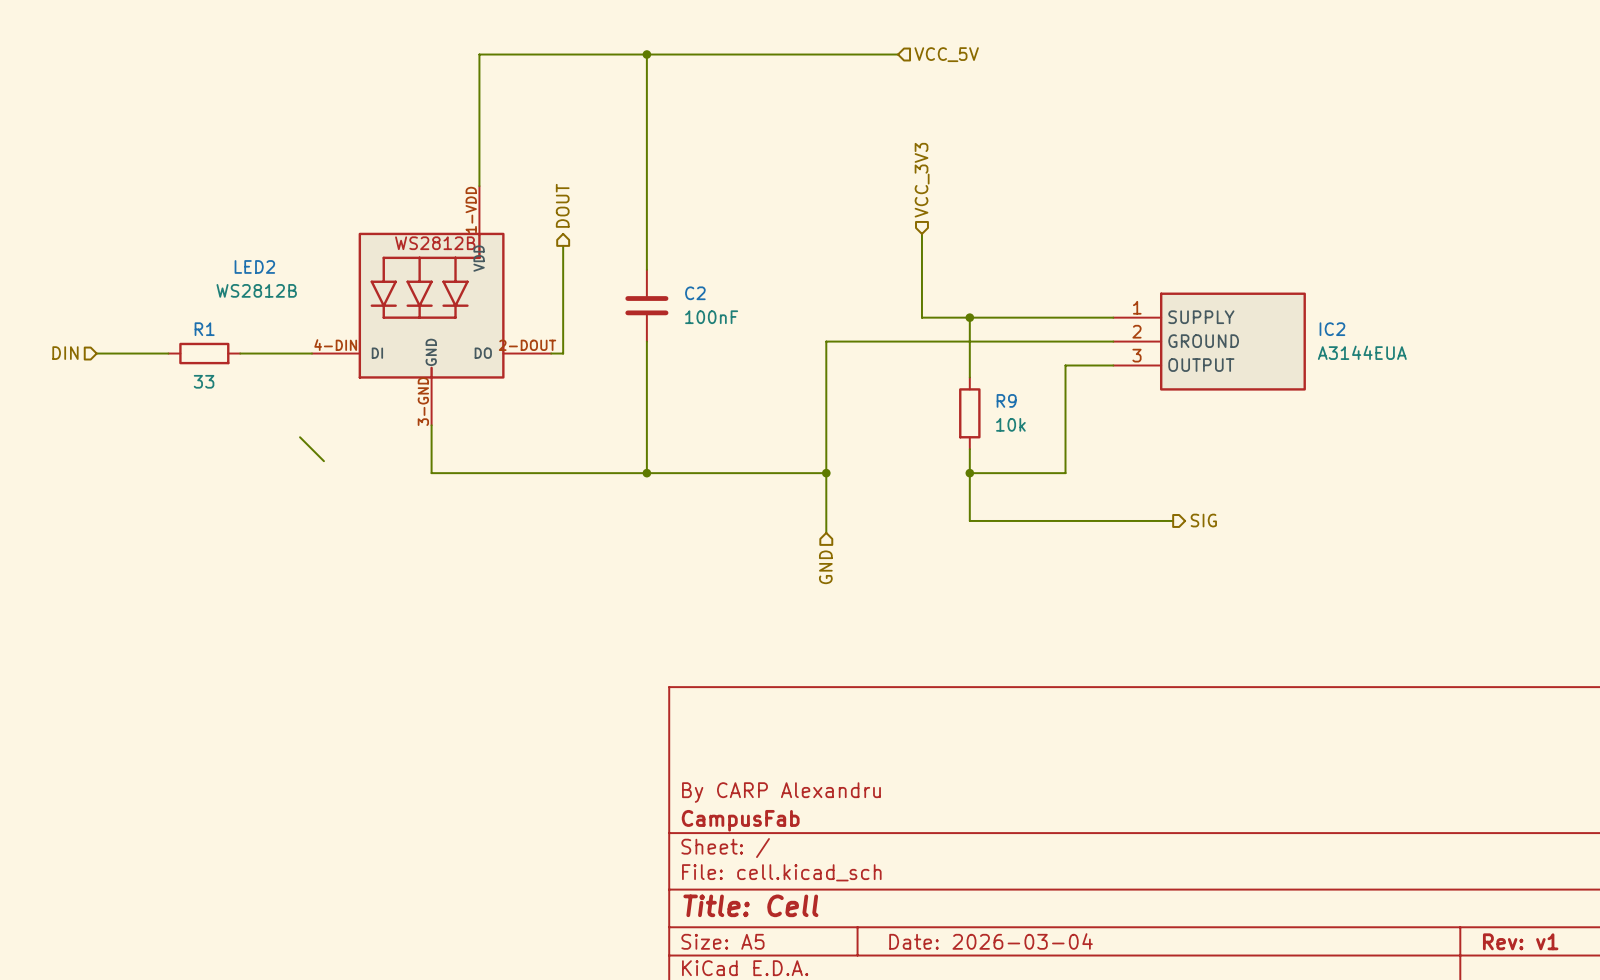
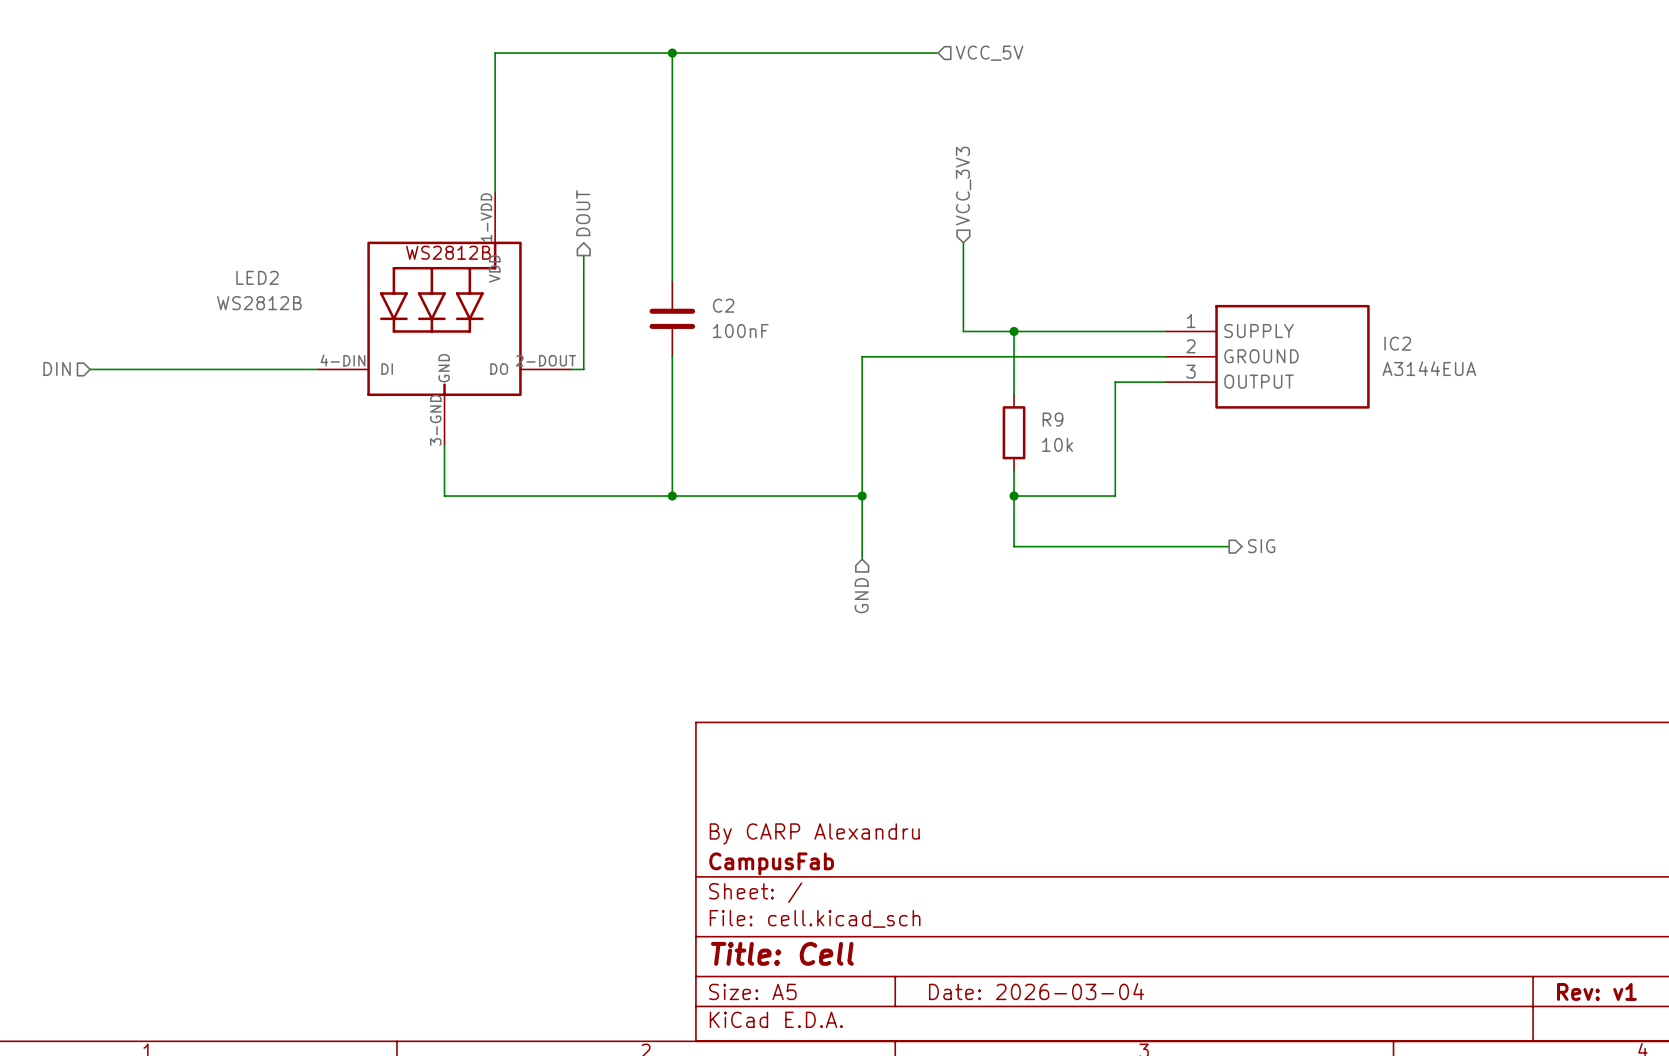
wire: none -> (166, 369) (242, 369)
R1: 33 (204, 353) -> none
wire: (300, 437) (323, 461) -> none

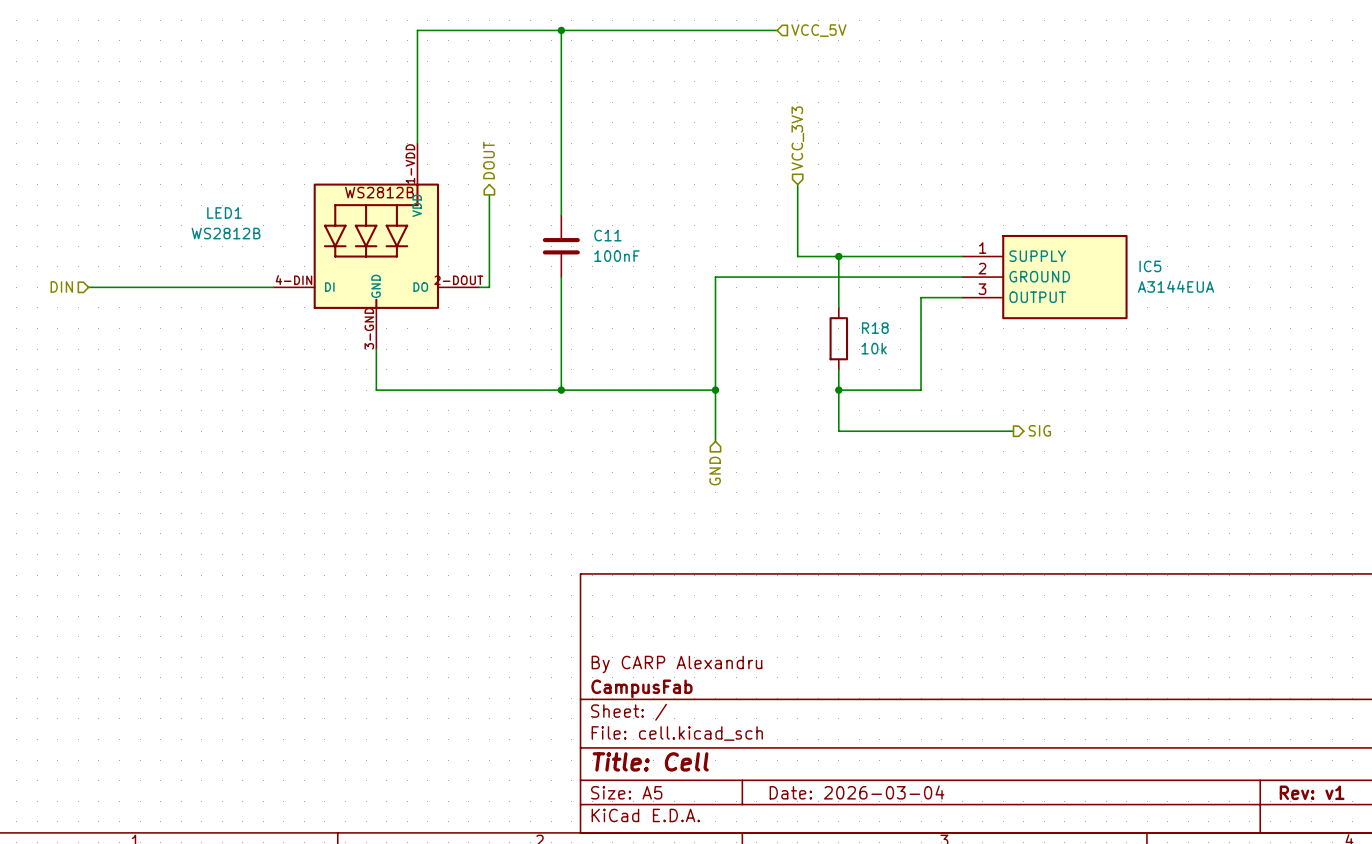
LED2 name: LED2 (257, 277) -> LED1 (224, 212)
C2 name: C2 (723, 305) -> C11 (607, 235)
IC2 name: IC2 (1397, 343) -> IC5 (1150, 266)
R9 name: R9 (1053, 419) -> R18 (875, 328)

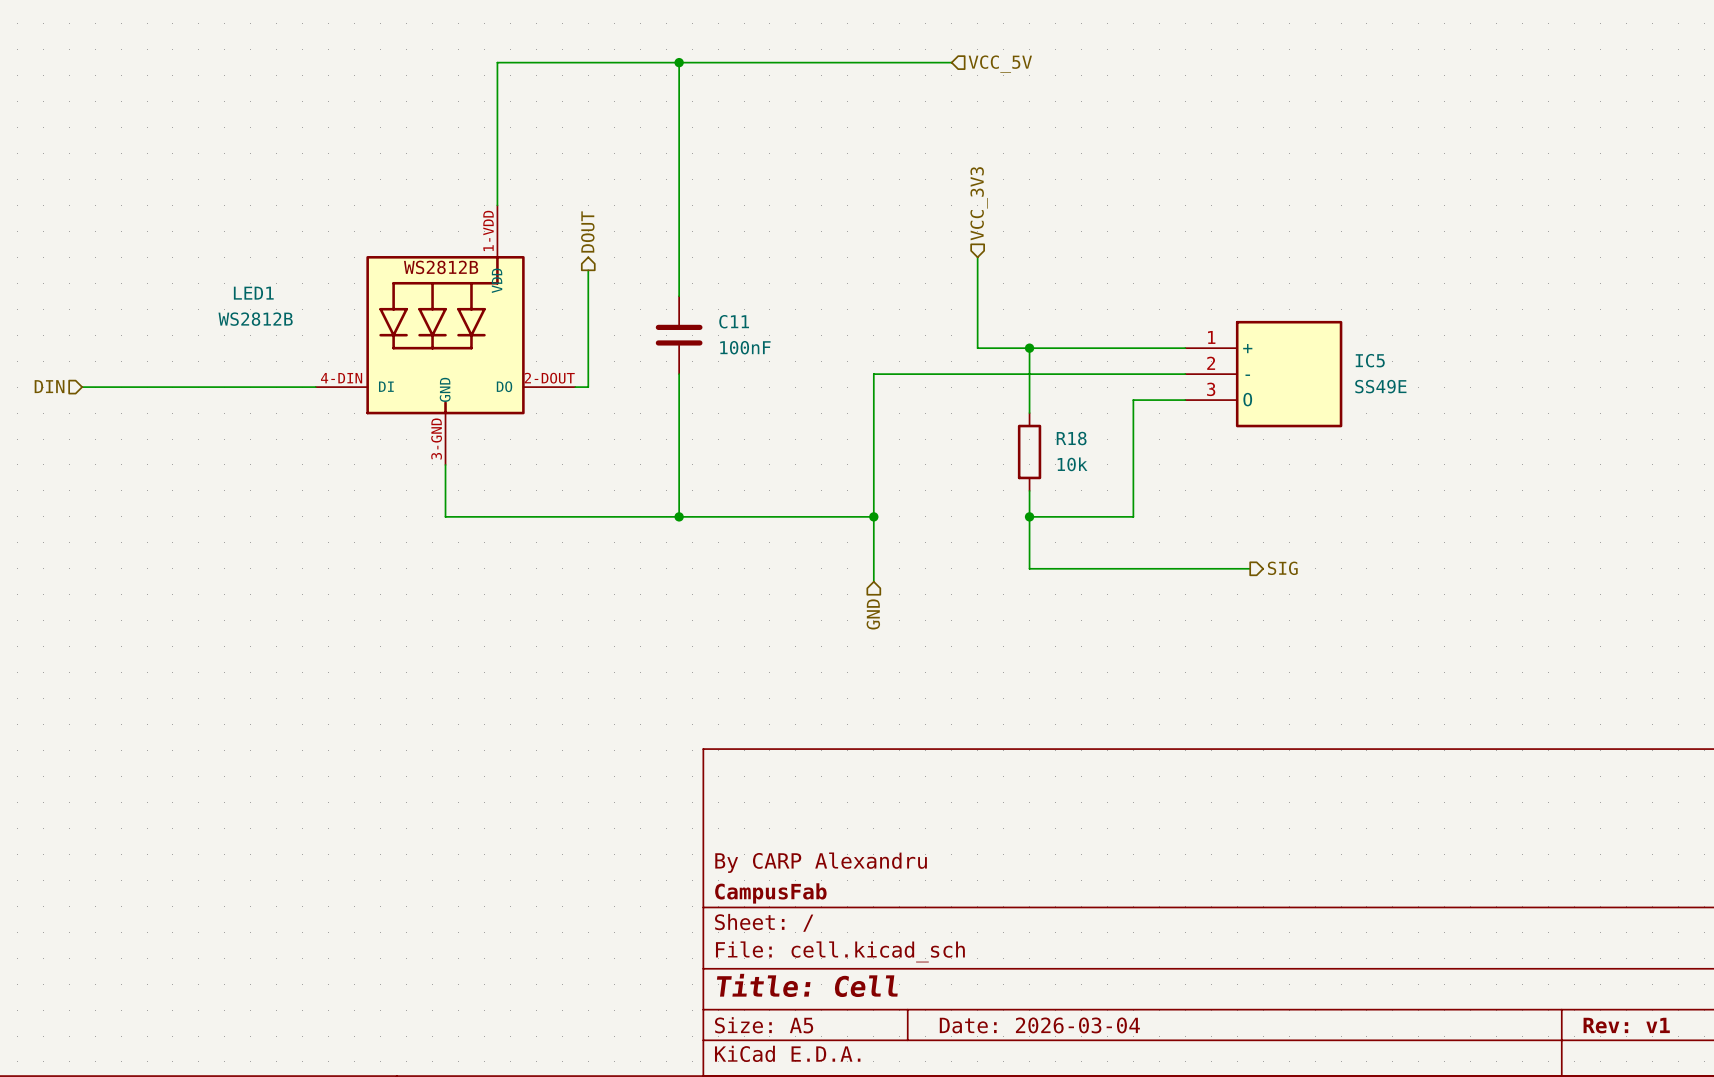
IC5 symbol: [962, 234, 1128, 320] -> [1185, 320, 1343, 428]
IC5 name position: IC5 (1150, 266) -> IC5 (1370, 360)
IC5 value: A3144EUA (1176, 286) -> SS49E (1380, 386)

